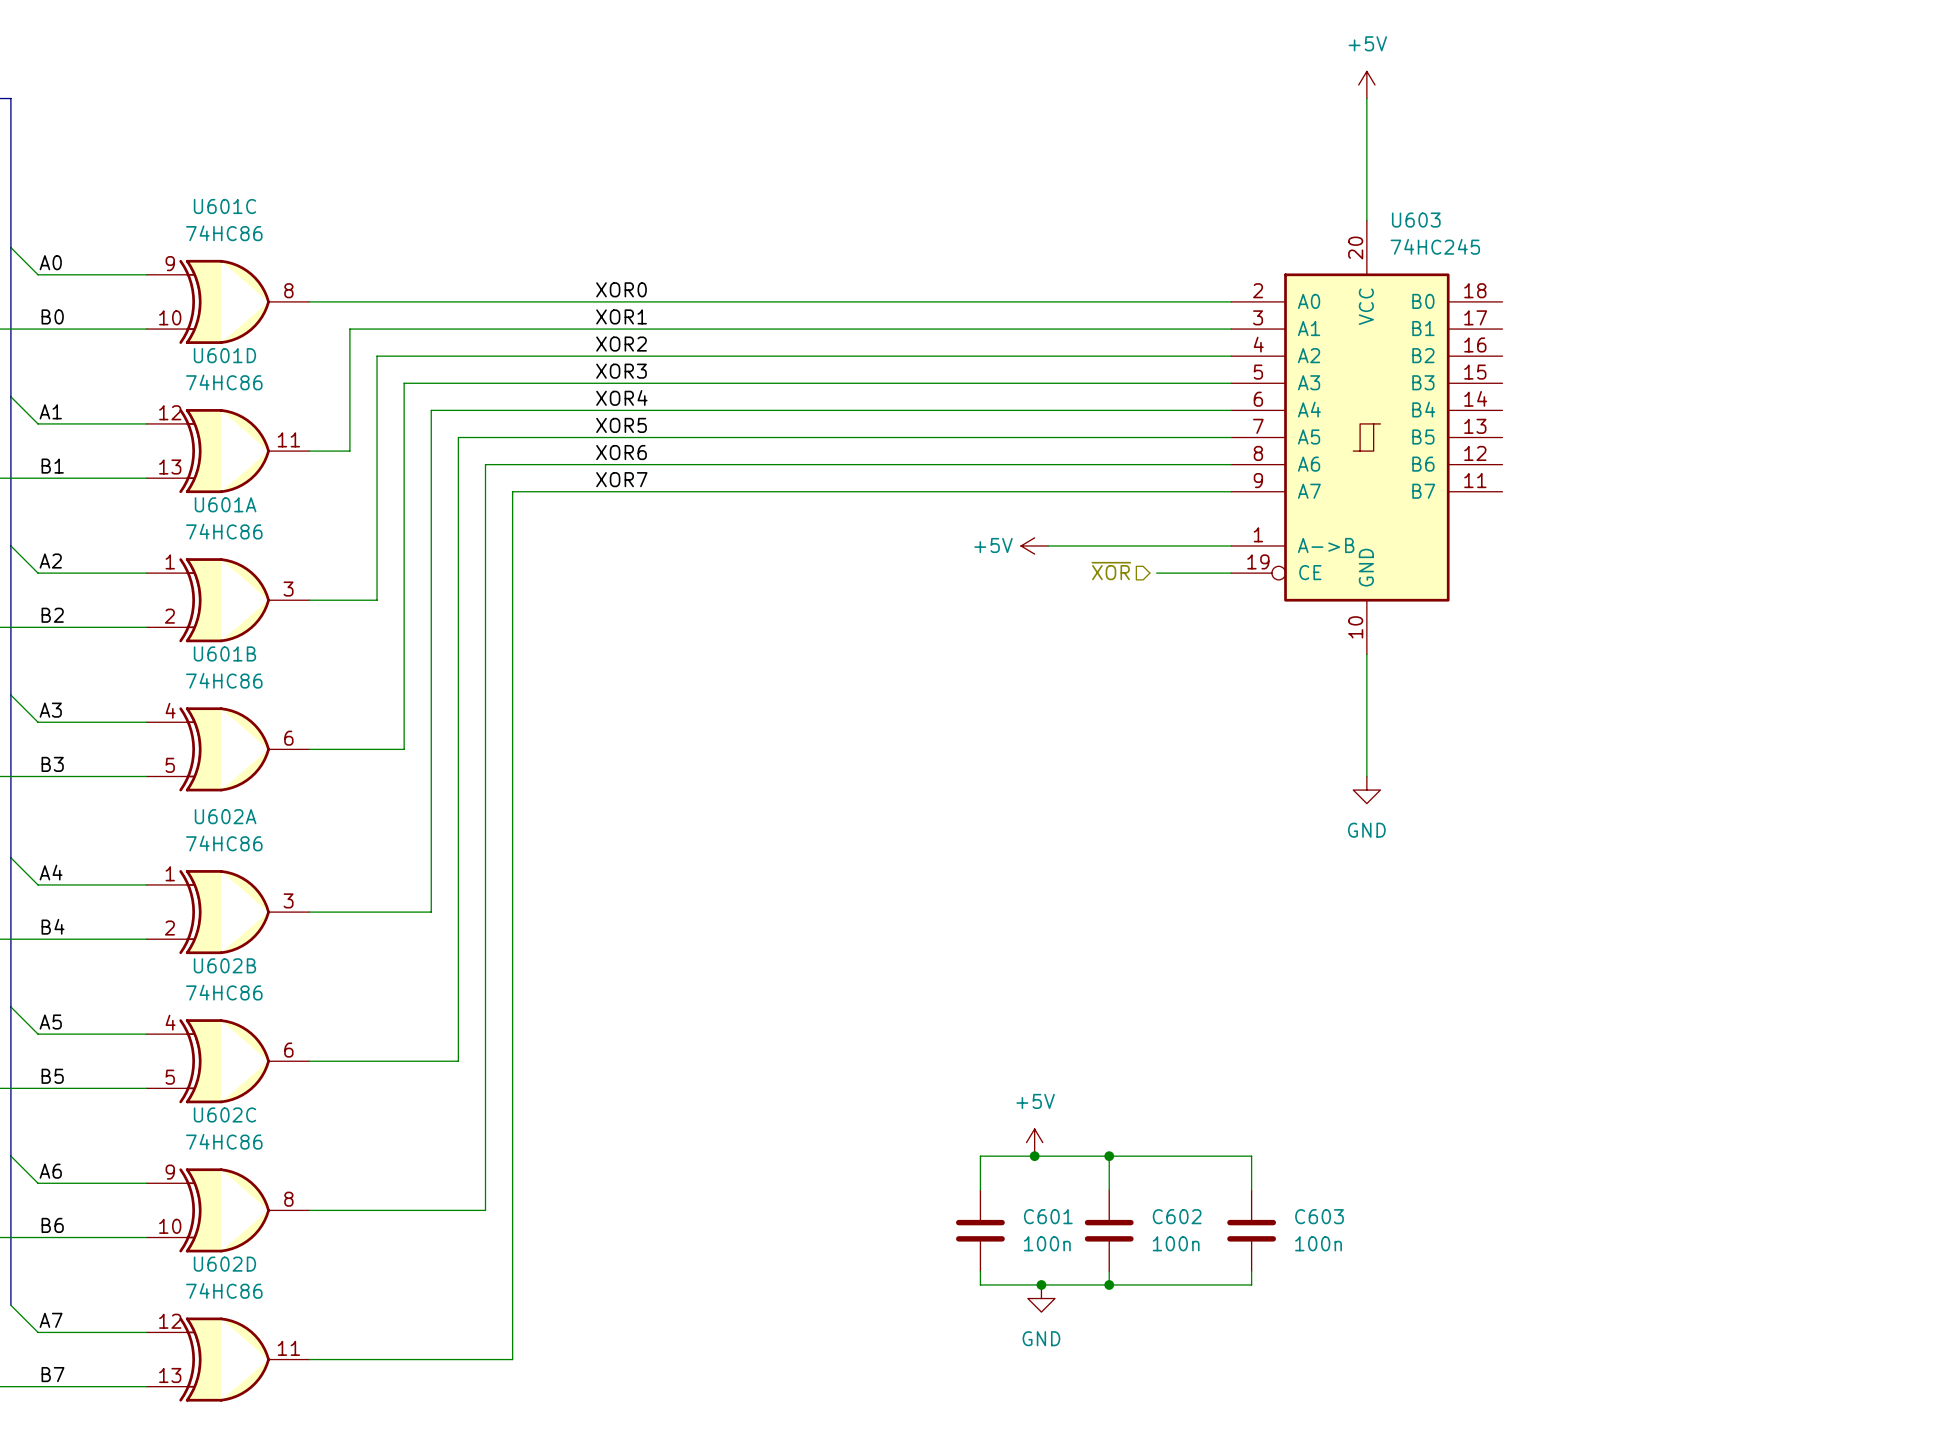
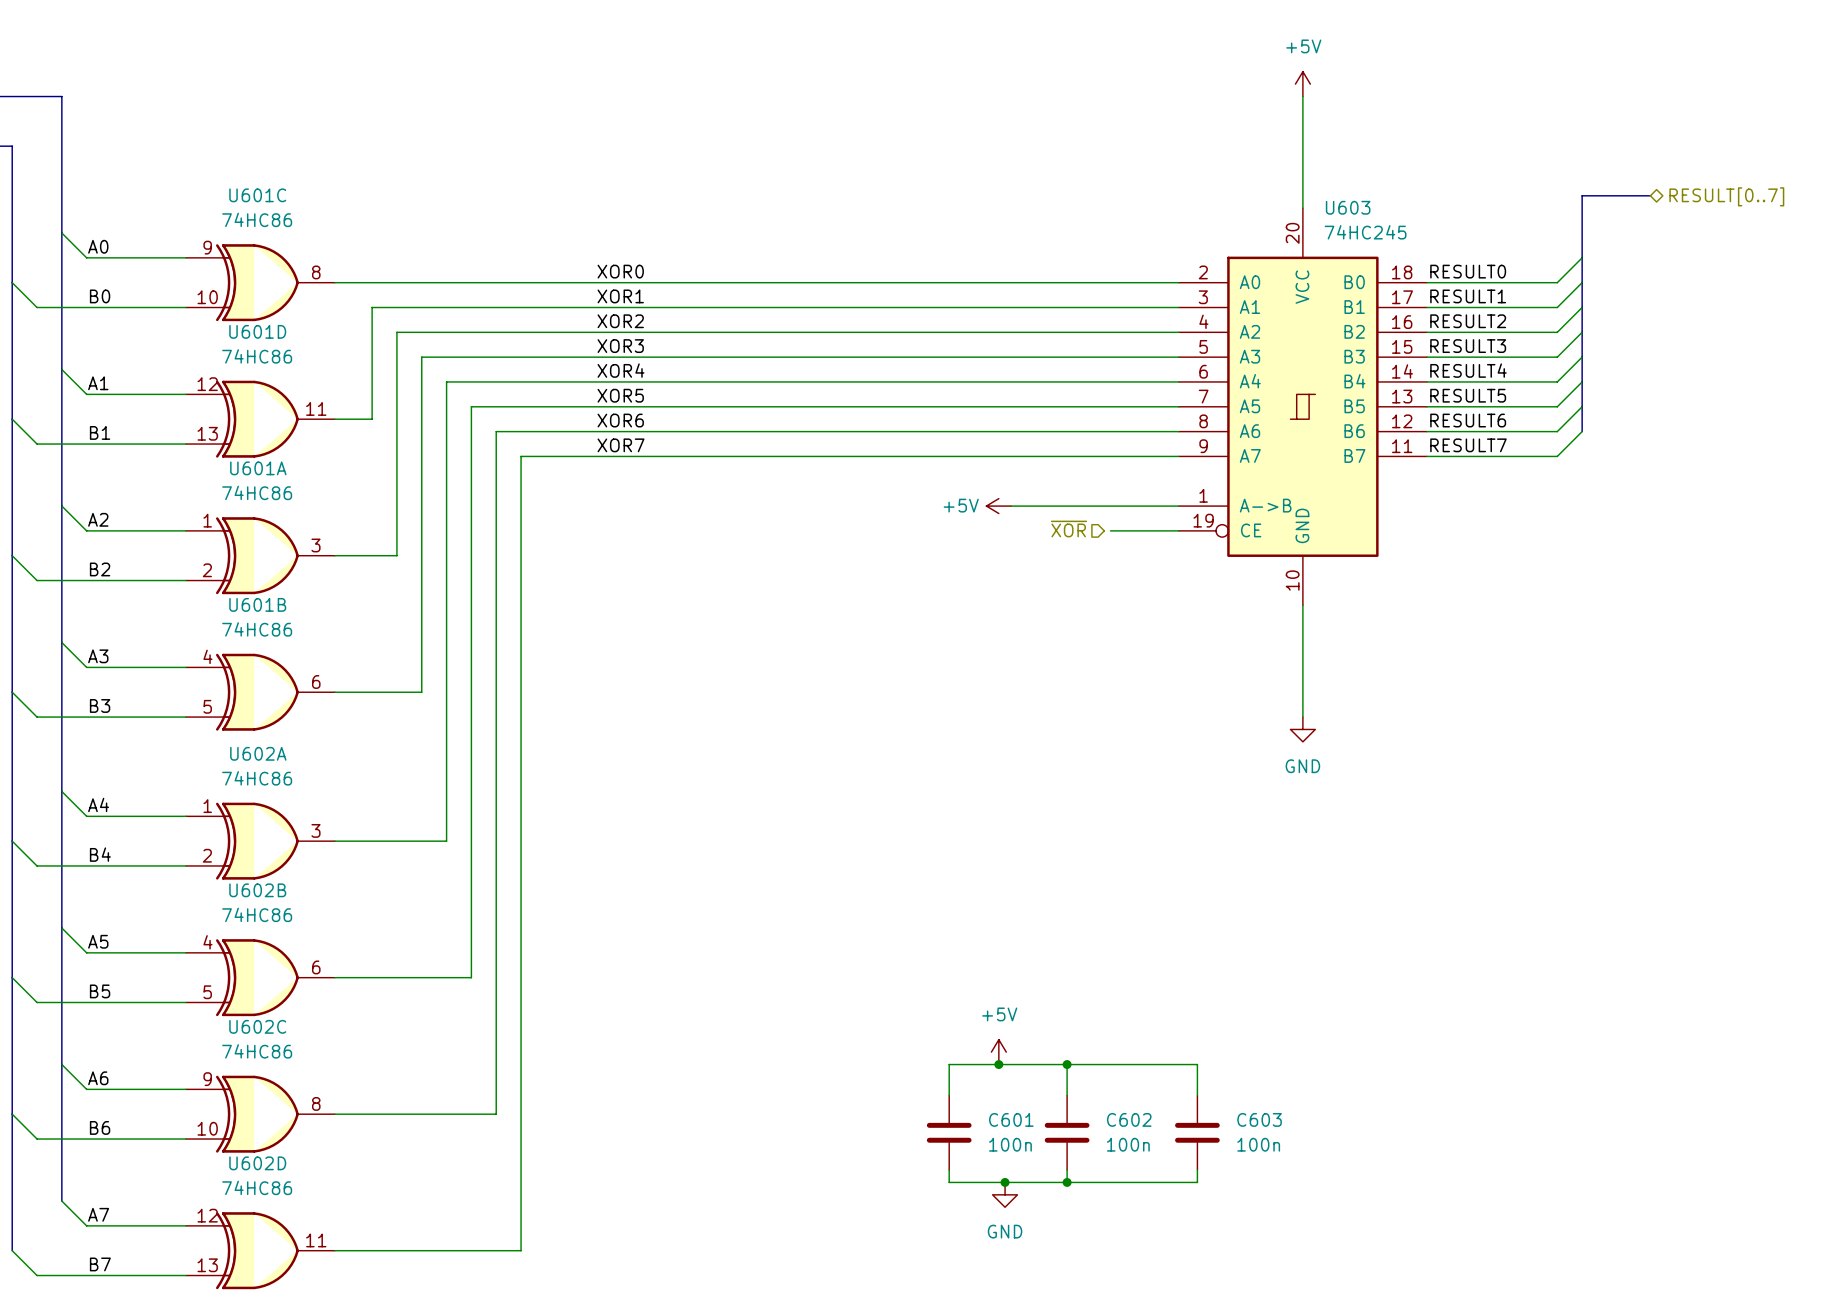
bus: none -> (1650, 195) (1582, 195) (1582, 431)
hierarchical label: none -> RESULT[0..7] (1726, 196)
wire: none -> (1582, 257) (1557, 282) (1427, 282)
label: none -> RESULT0 (1468, 271)
wire: none -> (1582, 282) (1557, 307) (1427, 307)
label: none -> RESULT1 (1468, 296)
wire: none -> (1582, 307) (1557, 332) (1427, 332)
label: none -> RESULT2 (1468, 321)
wire: none -> (1582, 332) (1557, 357) (1427, 357)
label: none -> RESULT3 (1468, 346)
wire: none -> (1582, 357) (1557, 381) (1427, 381)
label: none -> RESULT4 (1468, 370)
wire: none -> (1582, 381) (1557, 406) (1427, 406)
label: none -> RESULT5 (1468, 395)
wire: none -> (1582, 406) (1557, 431) (1427, 431)
label: none -> RESULT6 (1468, 420)
wire: none -> (1582, 431) (1557, 456) (1427, 456)
label: none -> RESULT7 (1468, 445)

